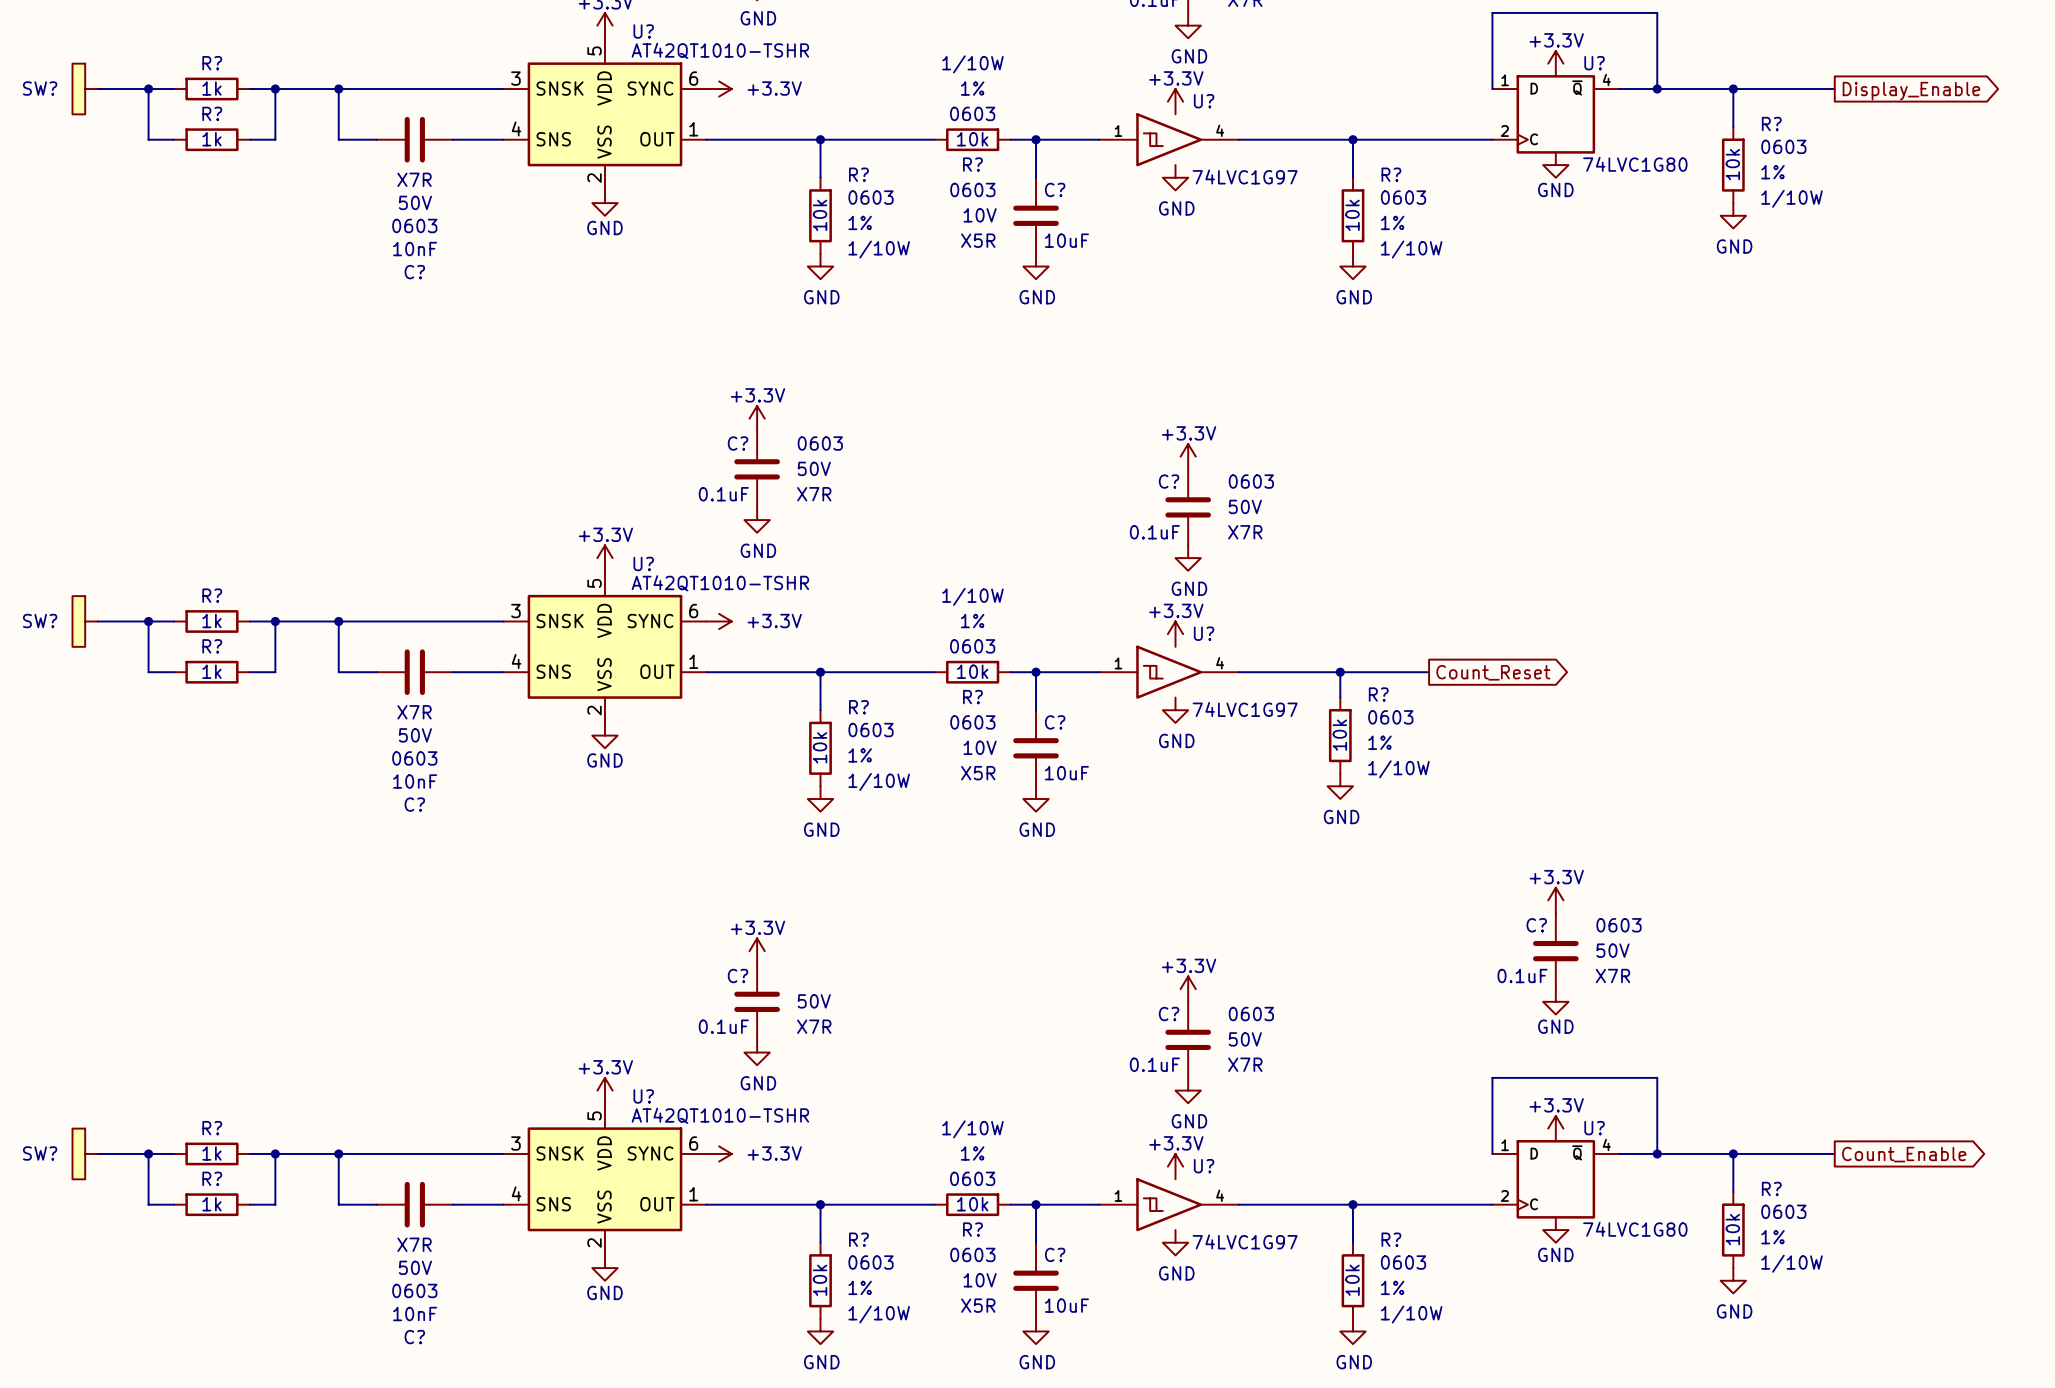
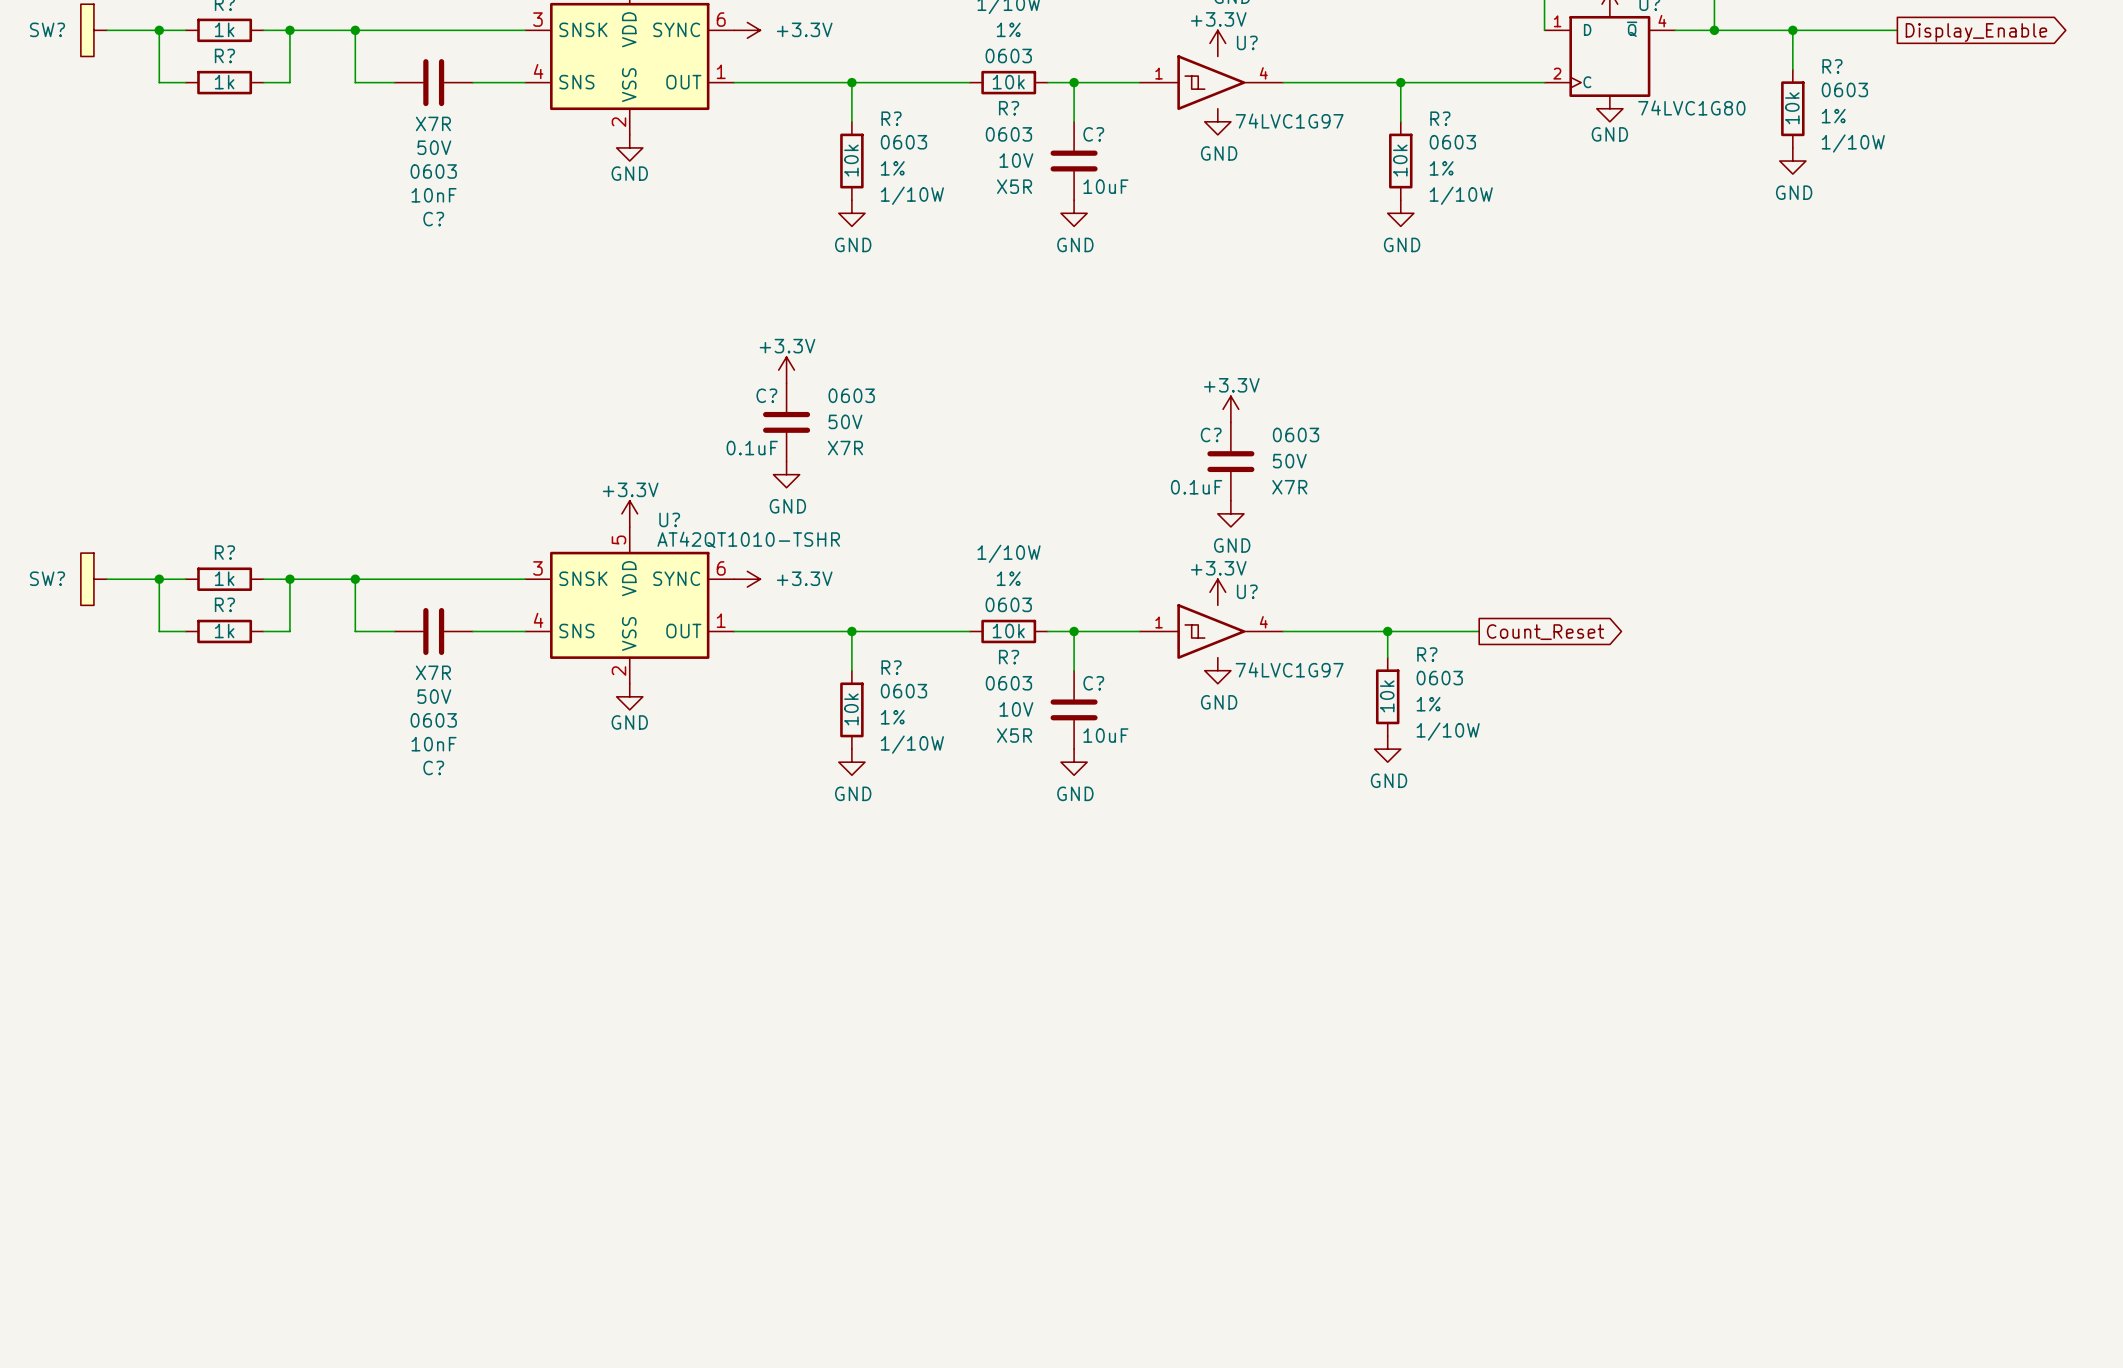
power symbol: +3.3V (1555, 900) -> none
power symbol: +3.3V (757, 951) -> none
C?: 0.1uF (1555, 951) -> none
power symbol: +3.3V (1188, 989) -> none
C?: 0.1uF (757, 1001) -> none
power symbol: GND (1555, 1001) -> none
C?: 0.1uF (1188, 1039) -> none
power symbol: GND (757, 1052) -> none
power symbol: +3.3V (604, 1090) -> none
power symbol: GND (1188, 1090) -> none
power symbol: +3.3V (1555, 1128) -> none
SW?: (85, 1153) -> none
wire: (97, 1153) (173, 1153) -> none
wire: (148, 1153) (148, 1204) (173, 1204) -> none
junction: (148, 1153) -> none
R?: 1k (211, 1153) -> none
wire: (250, 1153) (503, 1153) -> none
wire: (275, 1153) (275, 1204) (250, 1204) -> none
junction: (275, 1153) -> none
wire: (338, 1153) (338, 1204) (376, 1204) -> none
junction: (338, 1153) -> none
power symbol: +3.3V (719, 1153) -> none
wire: (1492, 1153) (1492, 1077) (1657, 1077) (1657, 1153) -> none
wire: (1619, 1153) (1834, 1153) -> none
junction: (1657, 1153) -> none
wire: (1733, 1153) (1733, 1192) -> none
junction: (1733, 1153) -> none
global label: Count_Enable (1904, 1154) -> none
power symbol: +3.3V (1175, 1166) -> none
U?: AT42QT1010-TSHR (604, 1179) -> none
U?: 74LVC1G80 (1555, 1179) -> none
R?: 1k (211, 1204) -> none
C?: 10nF (414, 1204) -> none
wire: (452, 1204) (503, 1204) -> none
wire: (706, 1204) (934, 1204) -> none
wire: (820, 1204) (820, 1242) -> none
junction: (820, 1204) -> none
R?: 10k (972, 1204) -> none
wire: (1010, 1204) (1099, 1204) -> none
wire: (1036, 1204) (1036, 1242) -> none
junction: (1036, 1204) -> none
U?: 74LVC1G97 (1169, 1204) -> none
wire: (1238, 1204) (1492, 1204) -> none
wire: (1352, 1204) (1352, 1242) -> none
junction: (1352, 1204) -> none
power symbol: GND (1555, 1230) -> none
R?: 10k (1733, 1230) -> none
power symbol: GND (1175, 1242) -> none
power symbol: GND (604, 1268) -> none
R?: 10k (820, 1280) -> none
C?: 10uF (1036, 1280) -> none
R?: 10k (1352, 1280) -> none
power symbol: GND (1733, 1280) -> none
power symbol: GND (820, 1331) -> none
power symbol: GND (1036, 1331) -> none
power symbol: GND (1352, 1331) -> none

